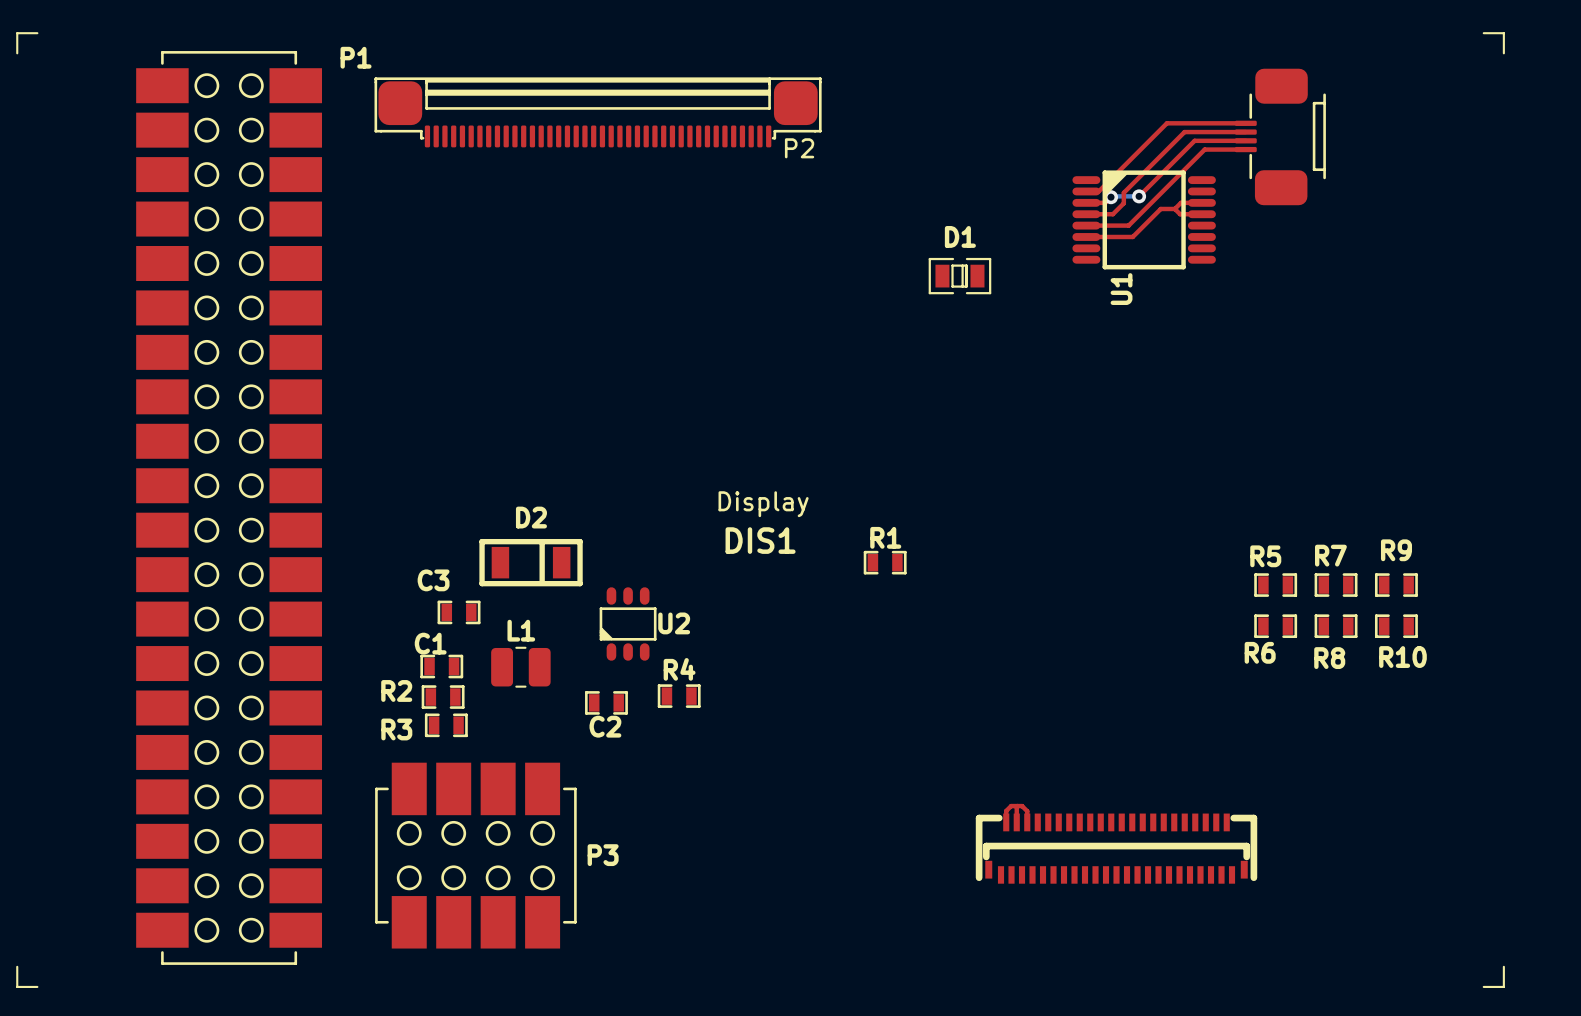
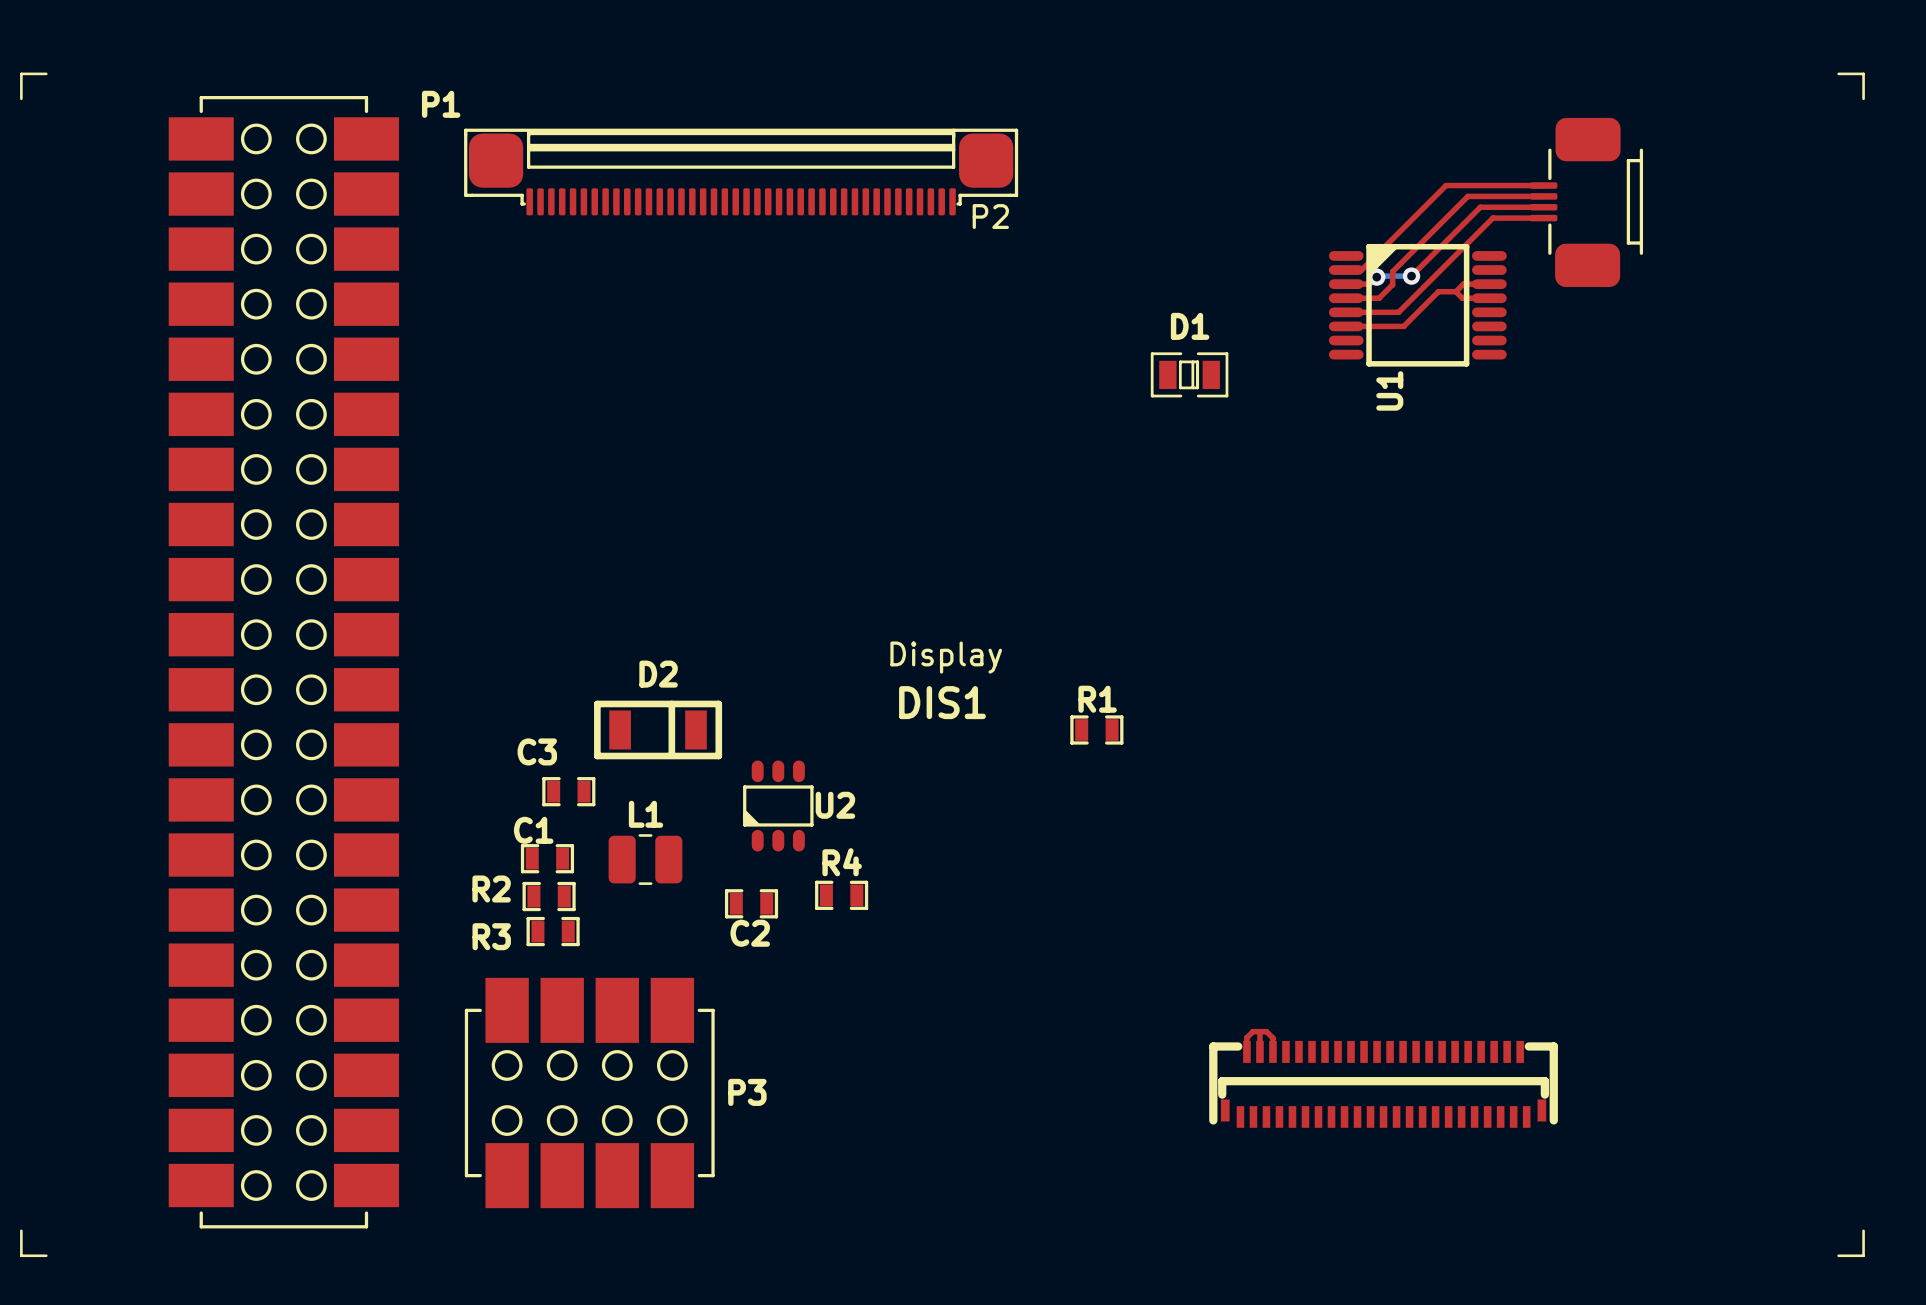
R5: (1275, 585) -> none
R7: (1336, 585) -> none
R9: (1396, 585) -> none
R6: (1275, 626) -> none
R8: (1336, 626) -> none
R10: (1396, 626) -> none

